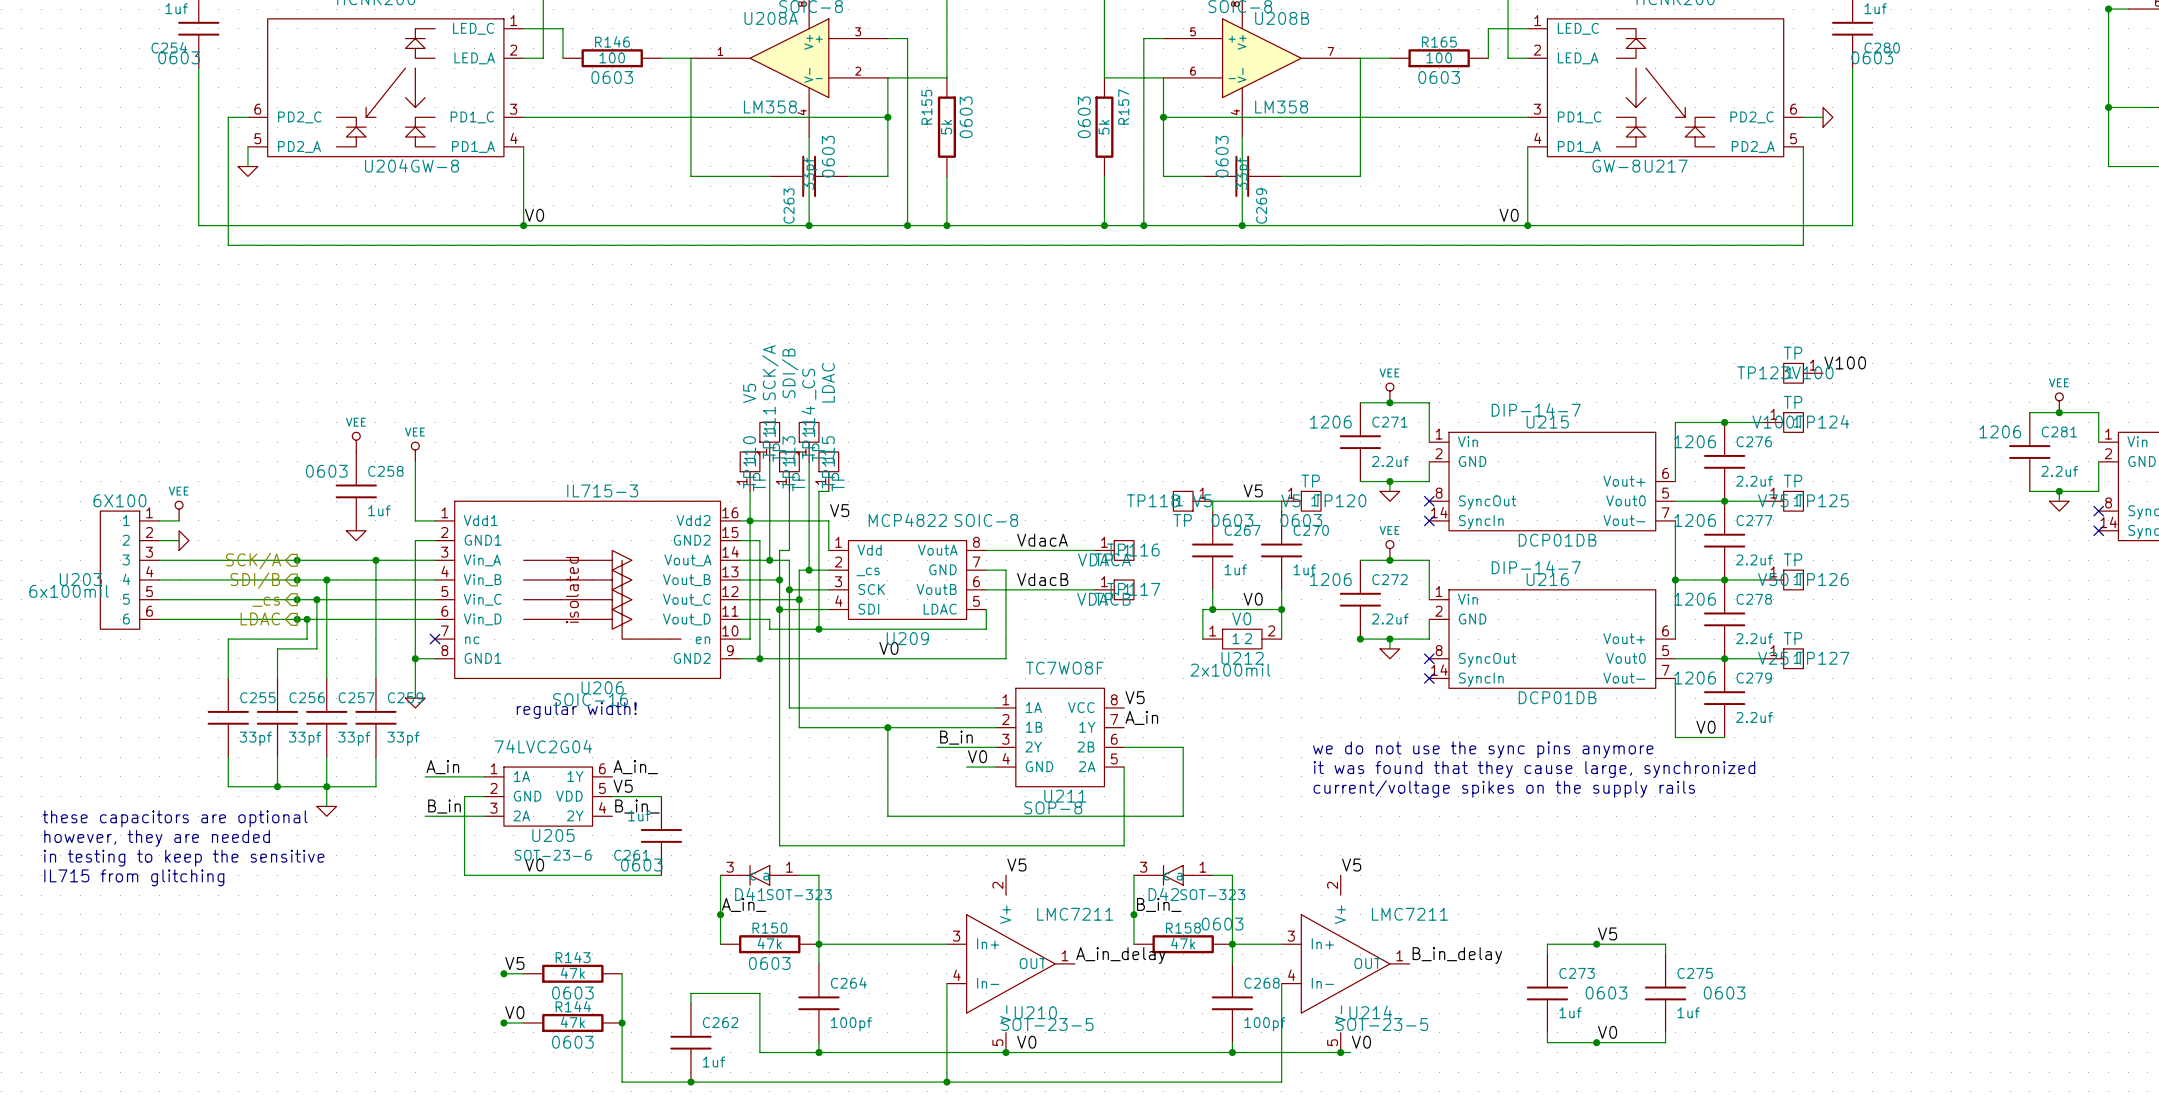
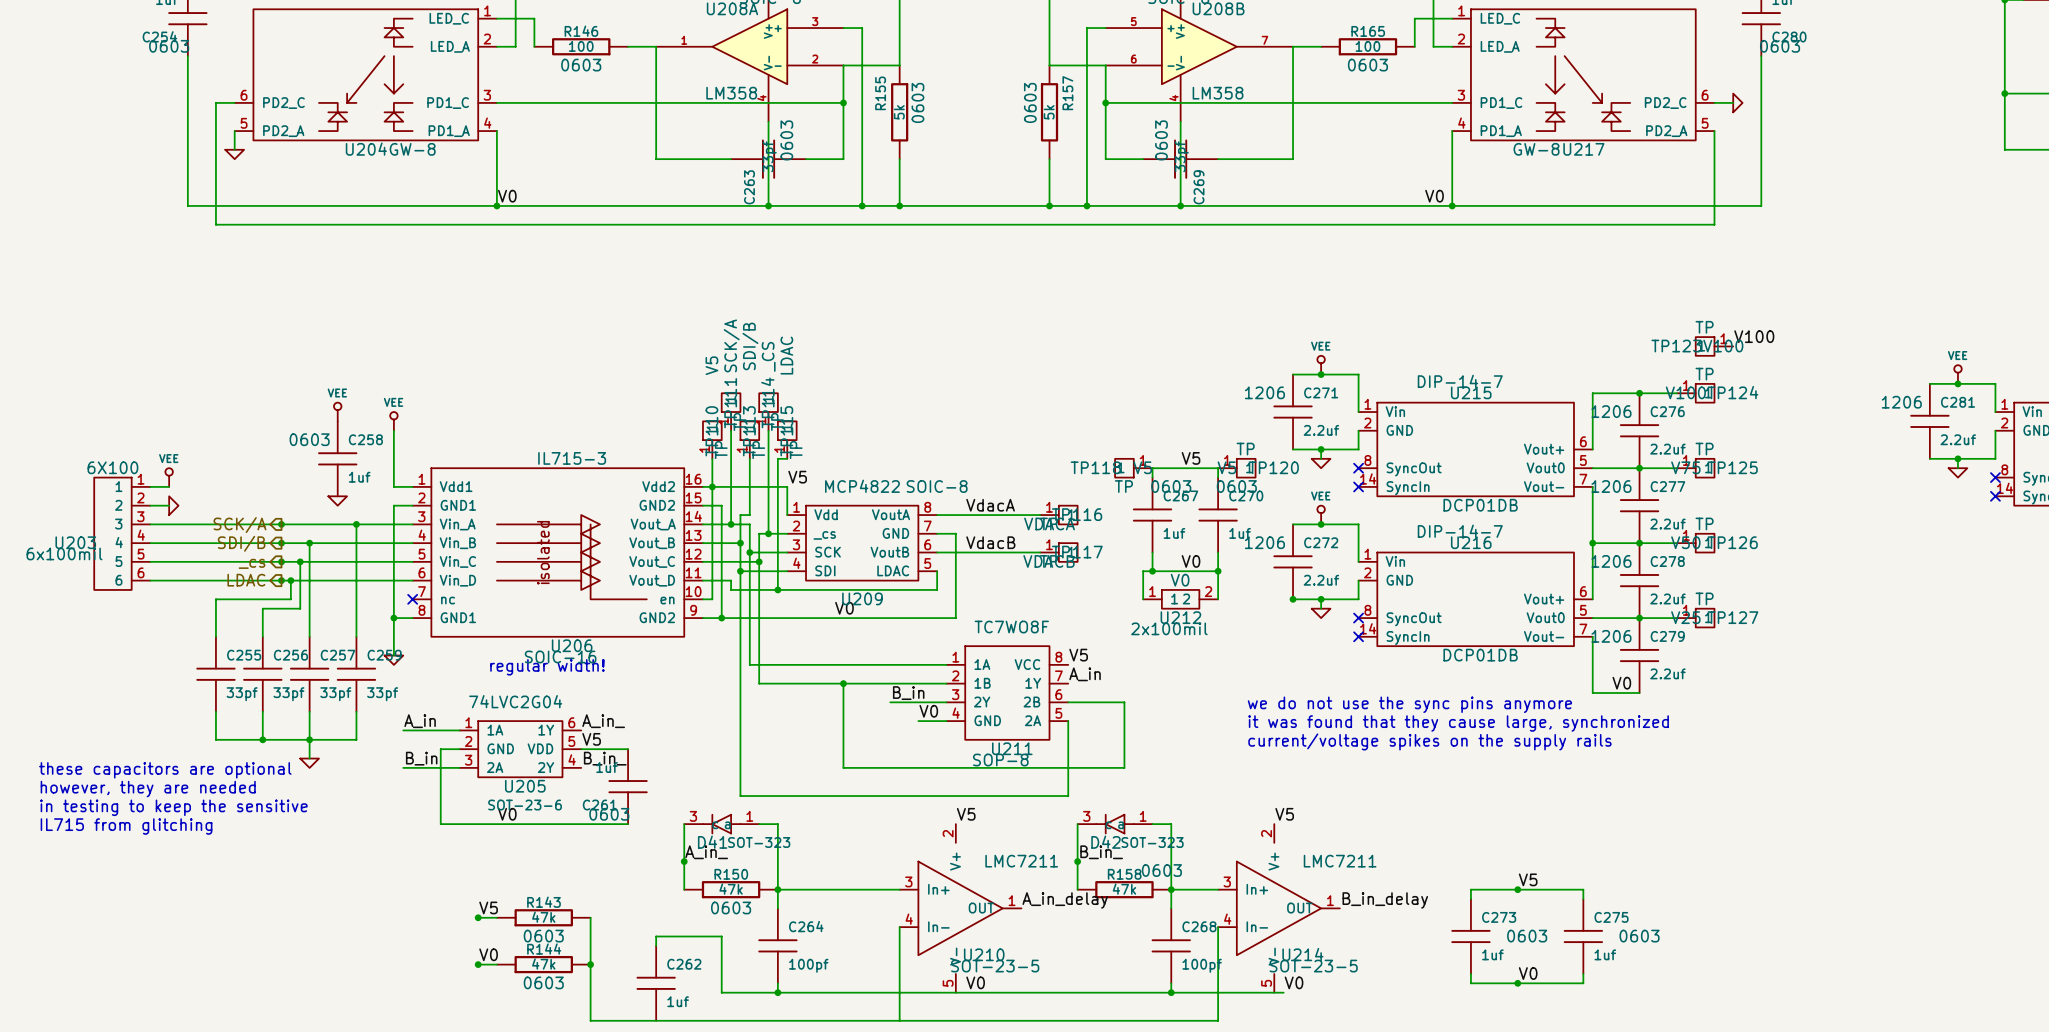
junction: (1006, 1052) -> none
junction: (1340, 1052) -> none
junction: (690, 1082) -> none
junction: (946, 1082) -> none

